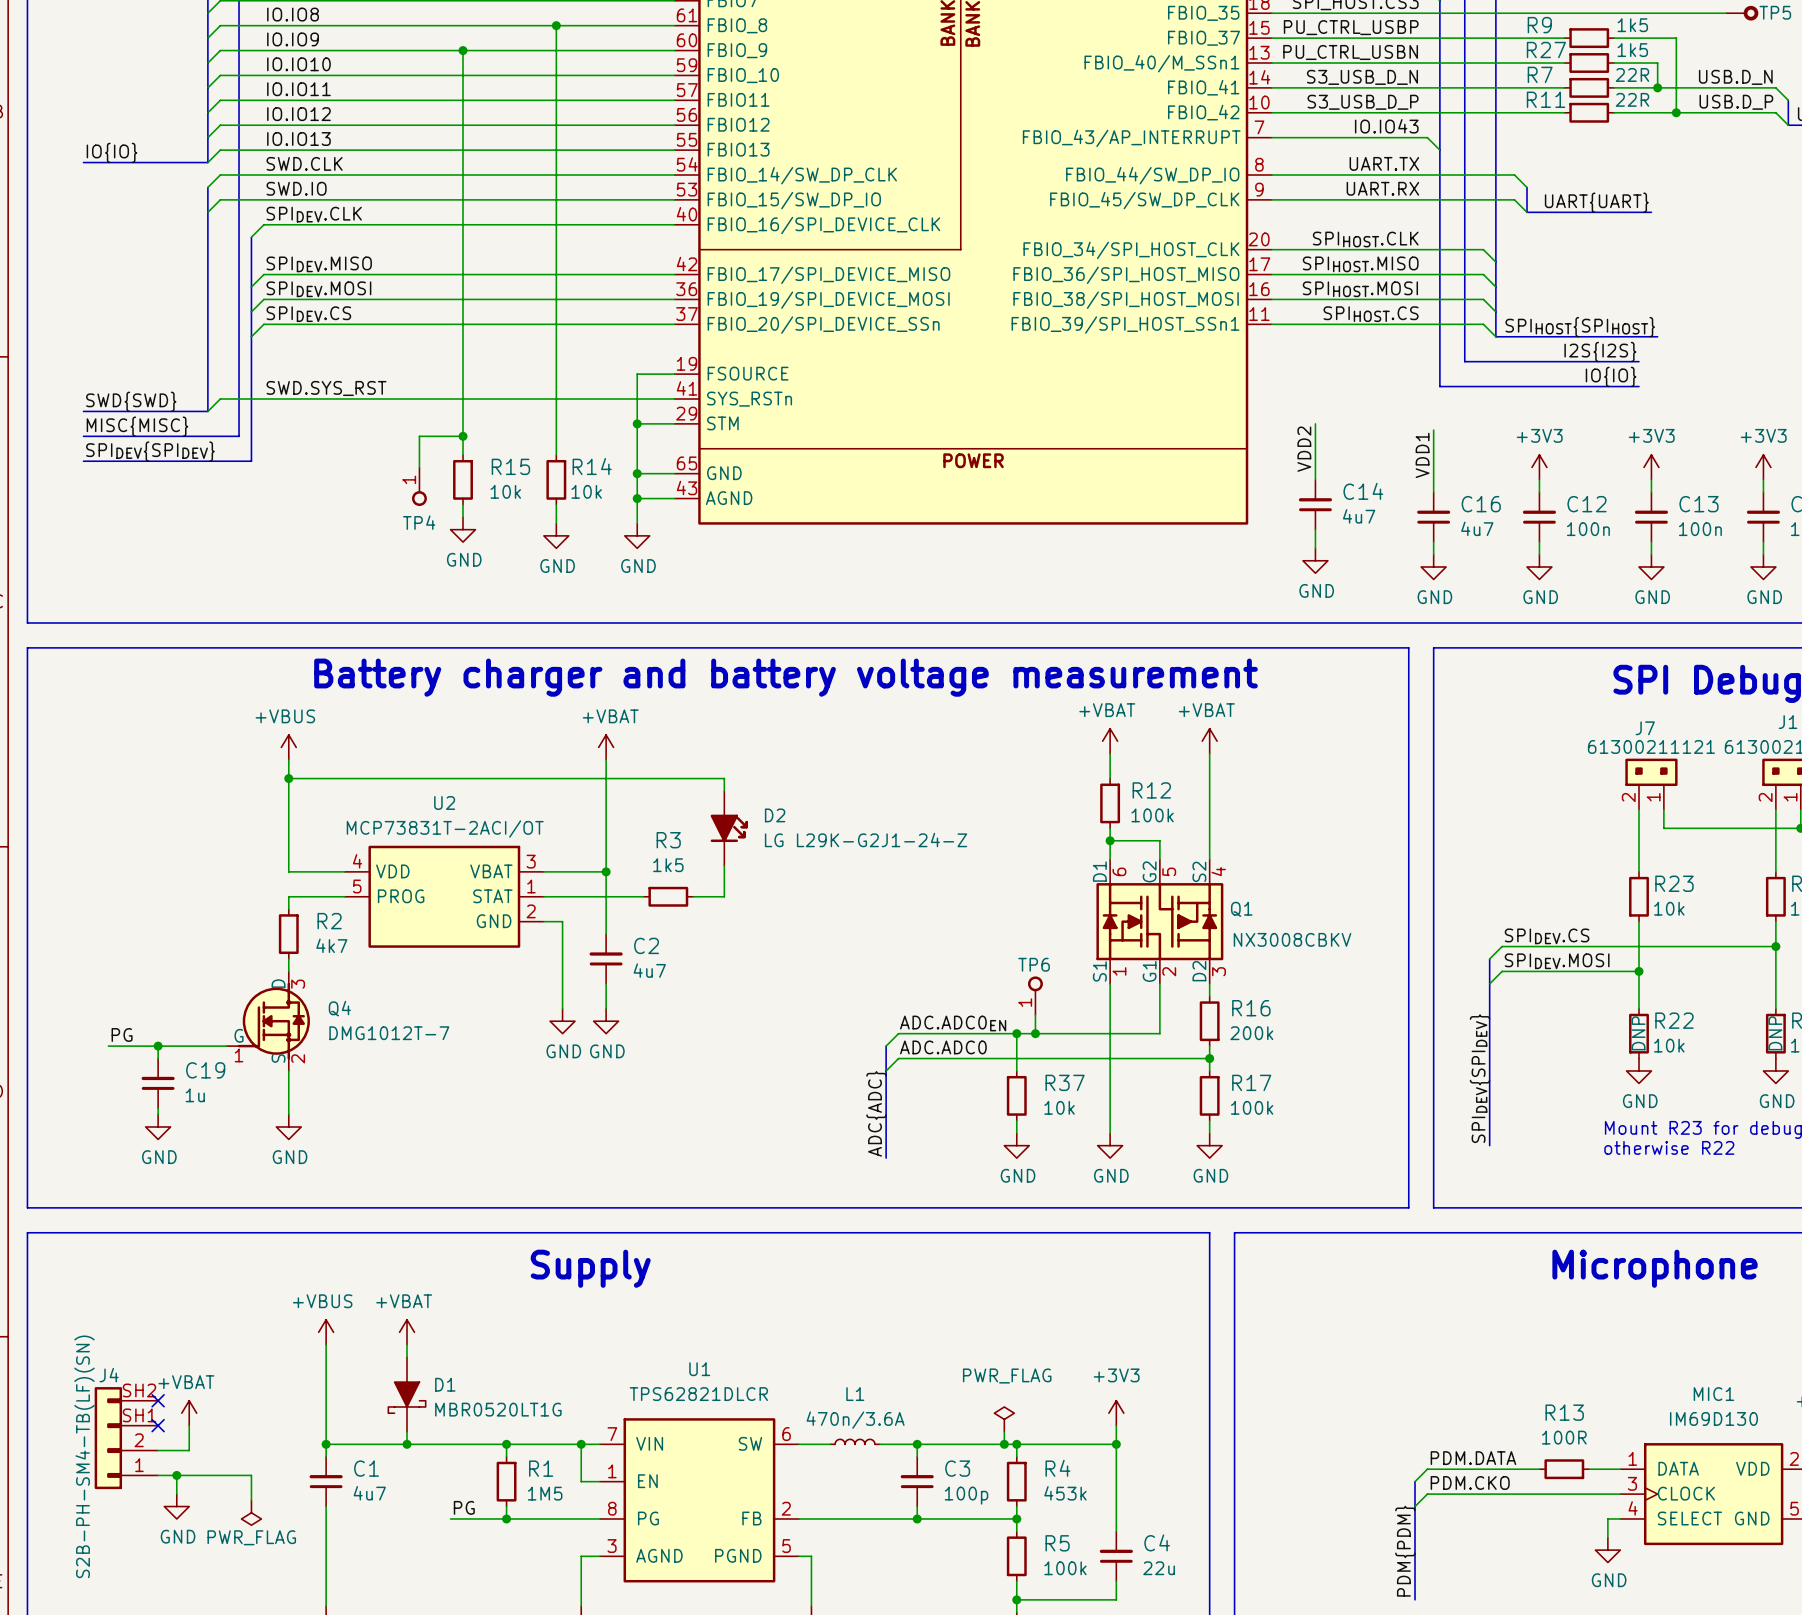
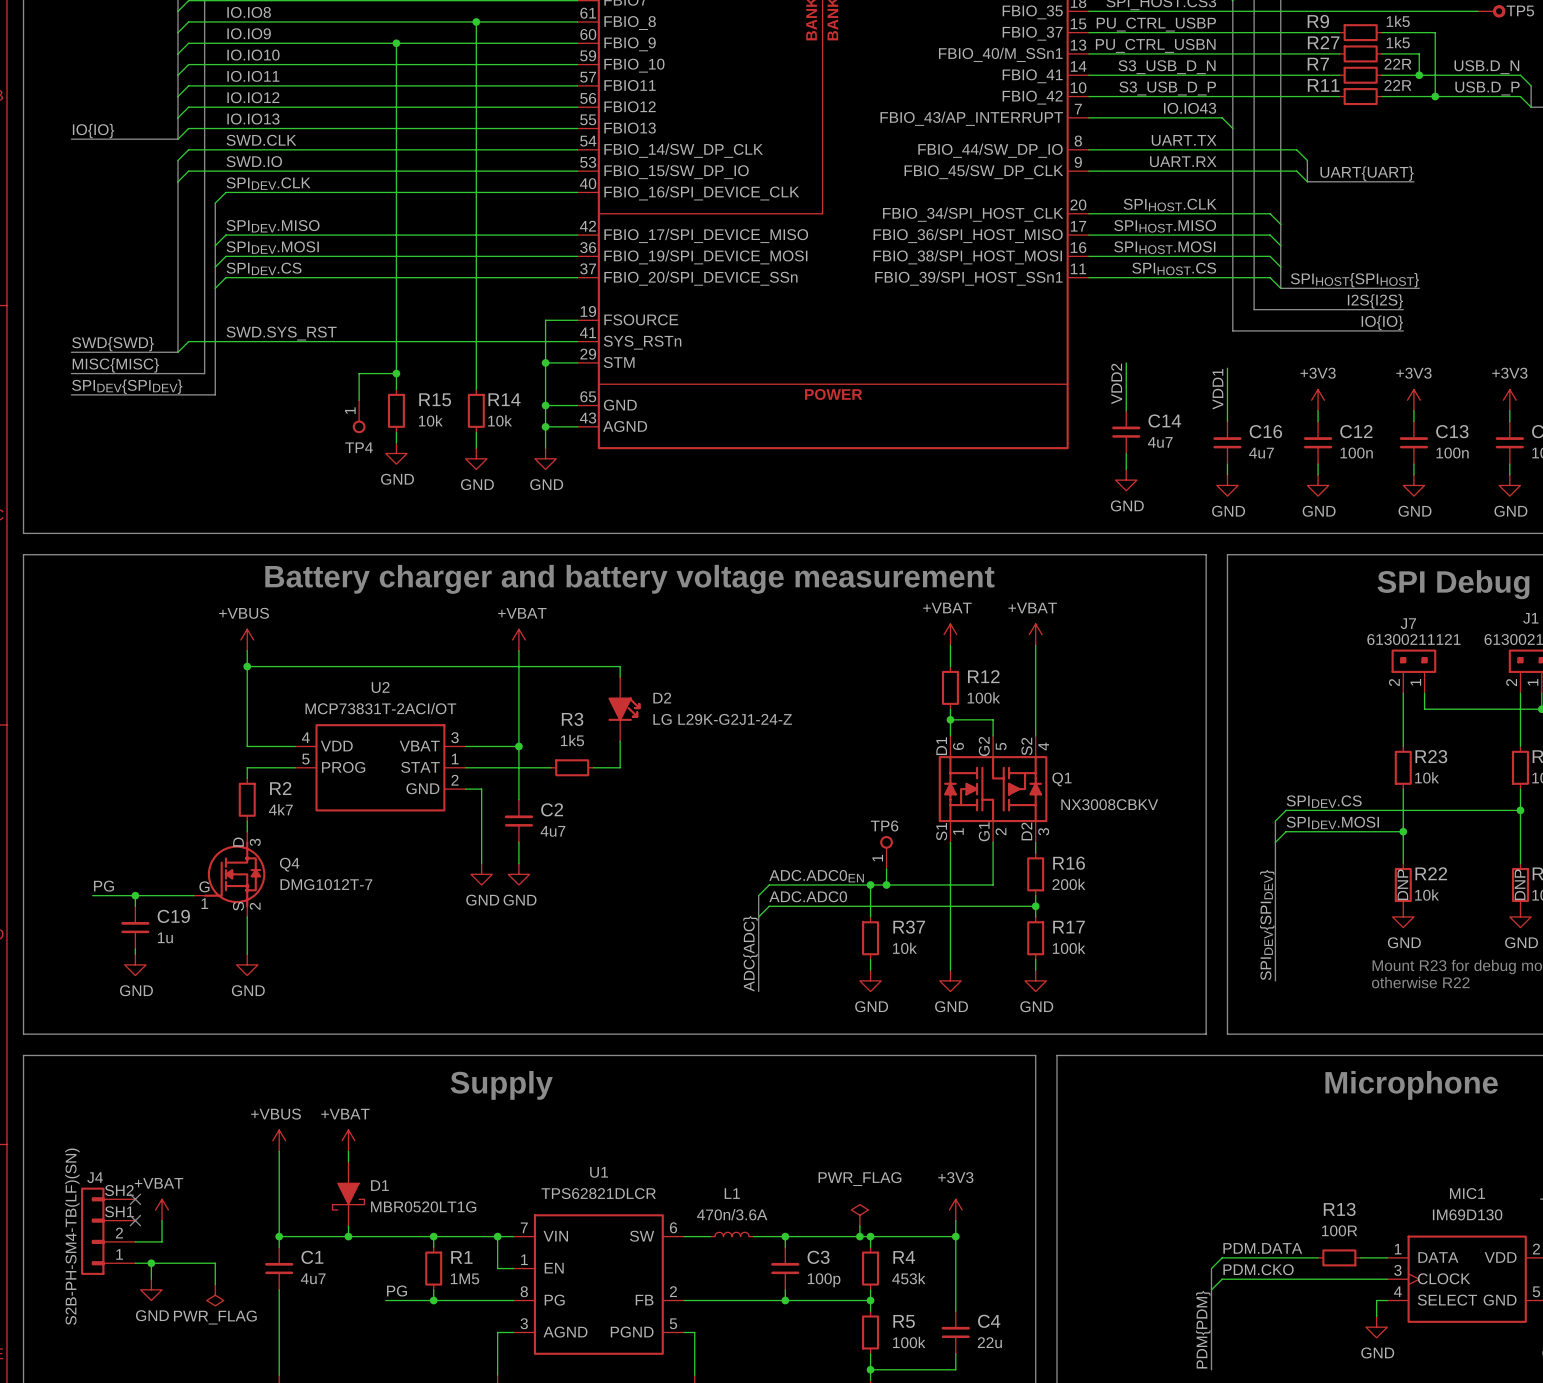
J4 text position: S2B-PH-SM4-TB(LF)(SN) (84, 1456) -> S2B-PH-SM4-TB(LF)(SN) (72, 1236)

